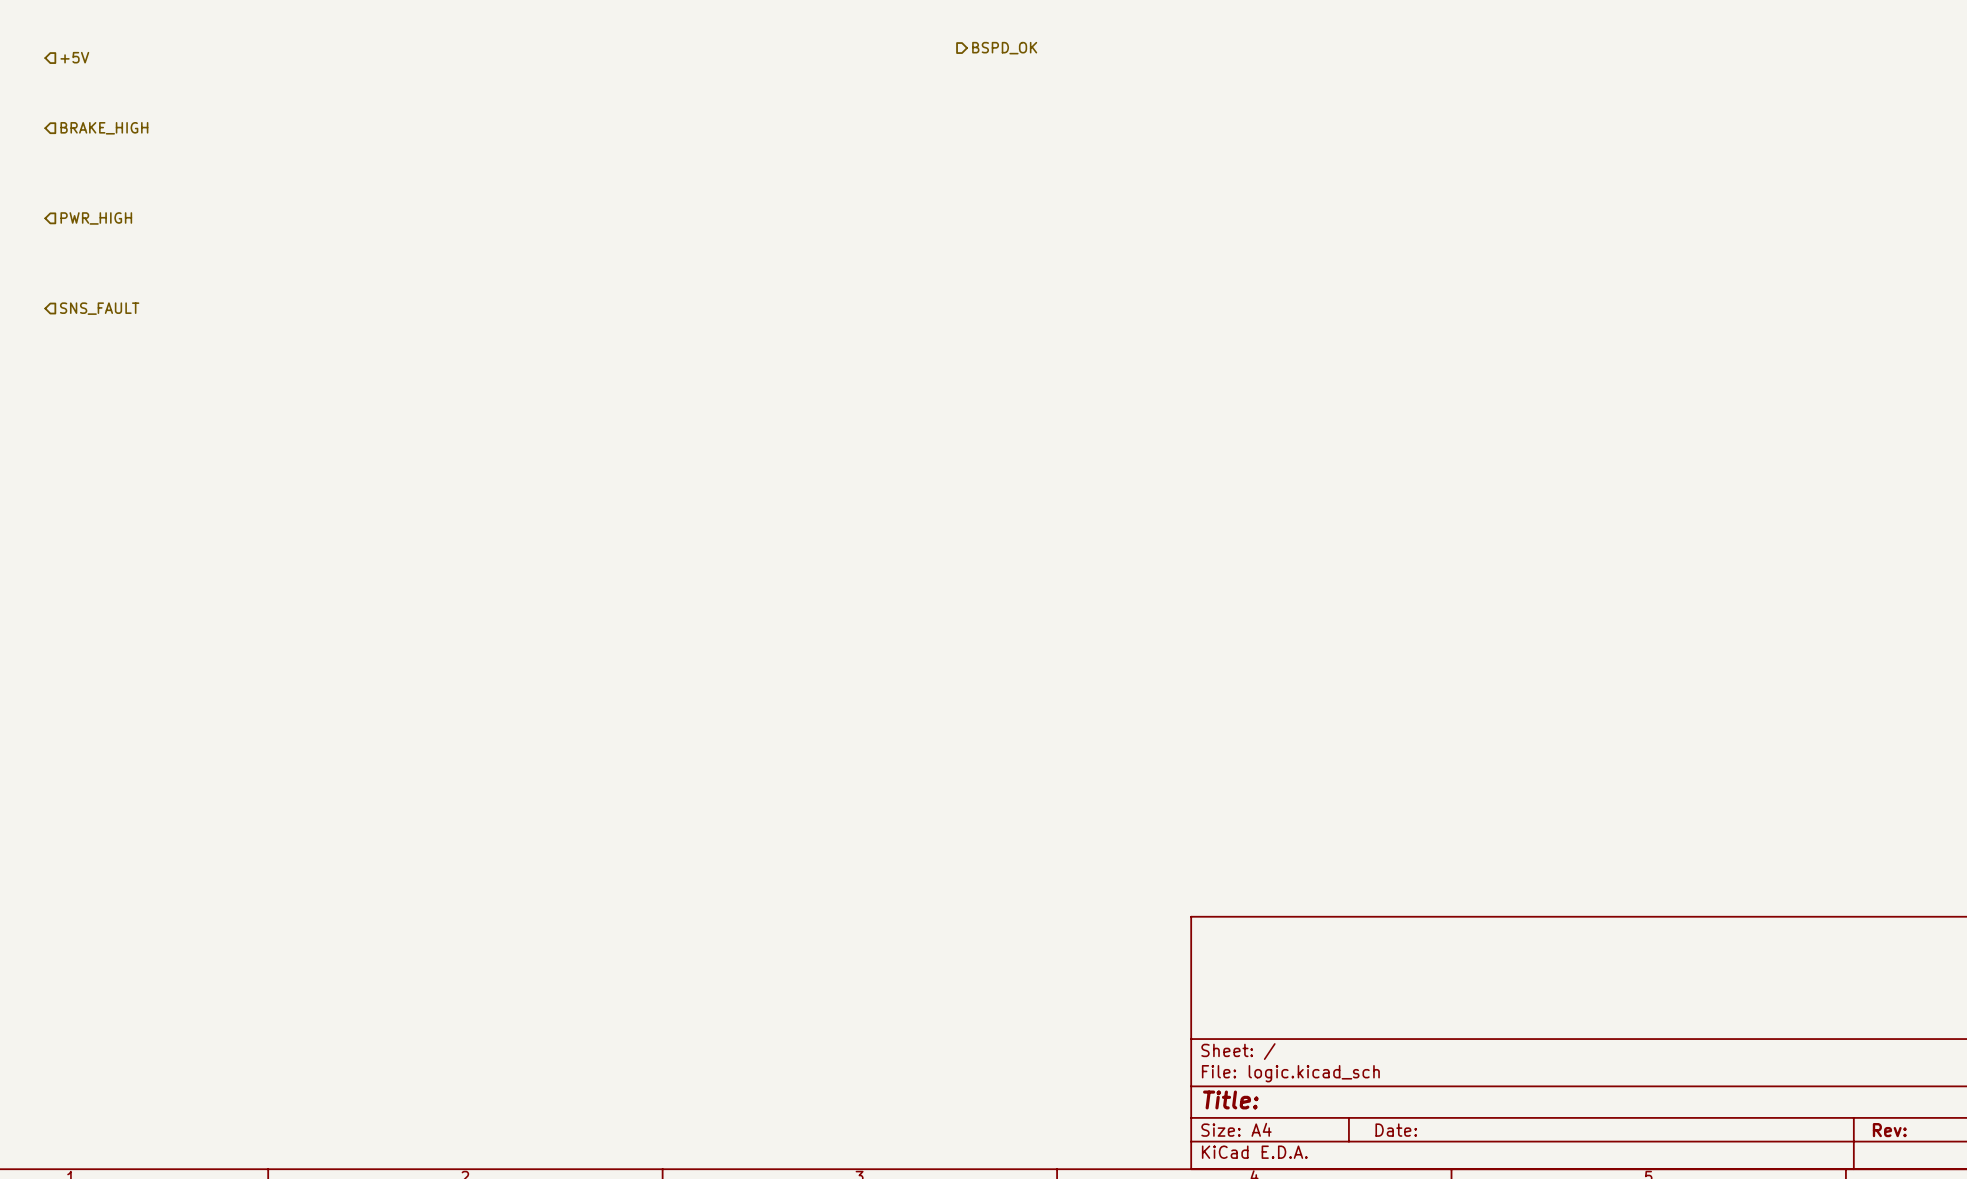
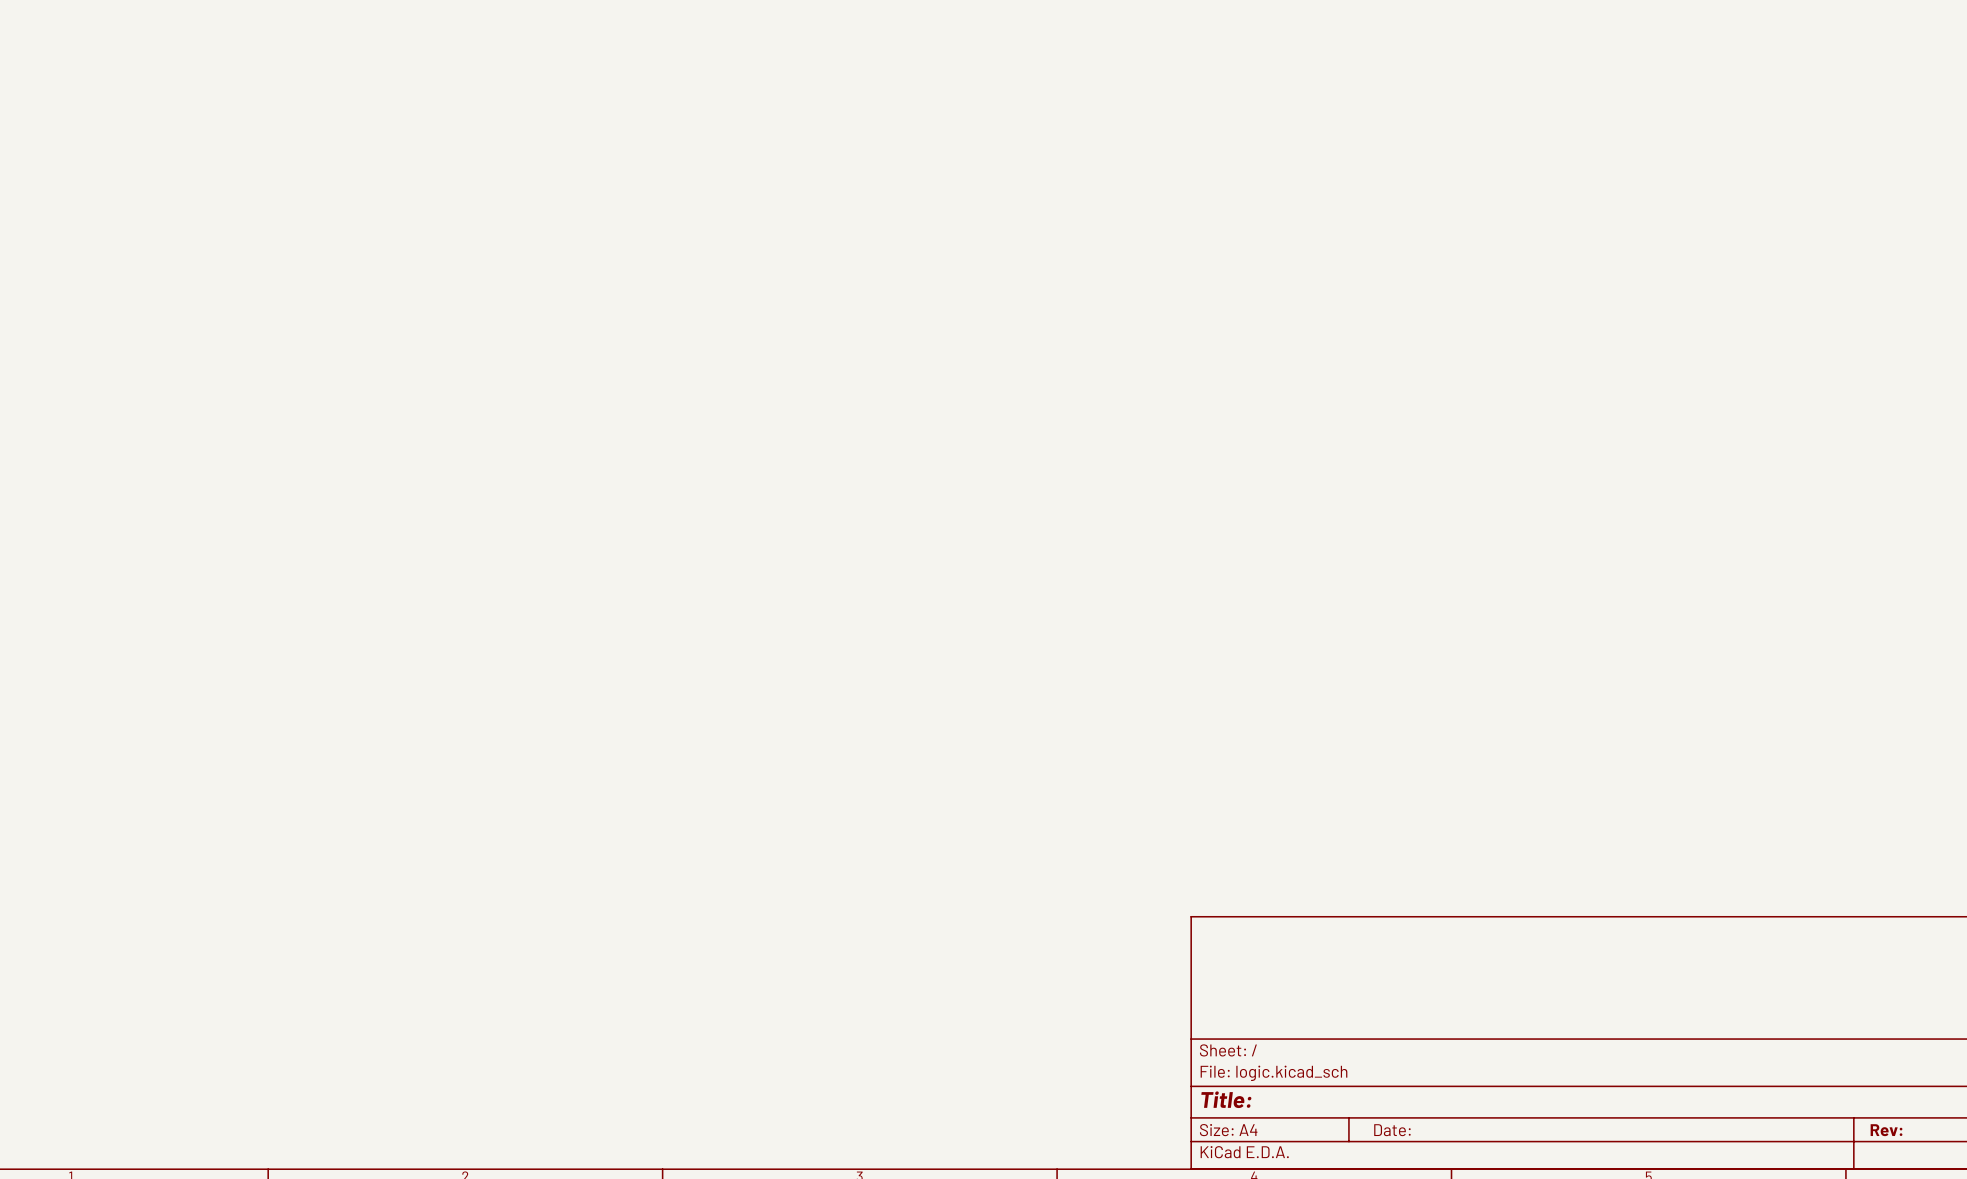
hierarchical label: BSPD_OK (1004, 48) -> none
hierarchical label: +5V (74, 57) -> none
hierarchical label: BRAKE_HIGH (104, 128) -> none
hierarchical label: PWR_HIGH (96, 218) -> none
hierarchical label: SNS_FAULT (99, 308) -> none

